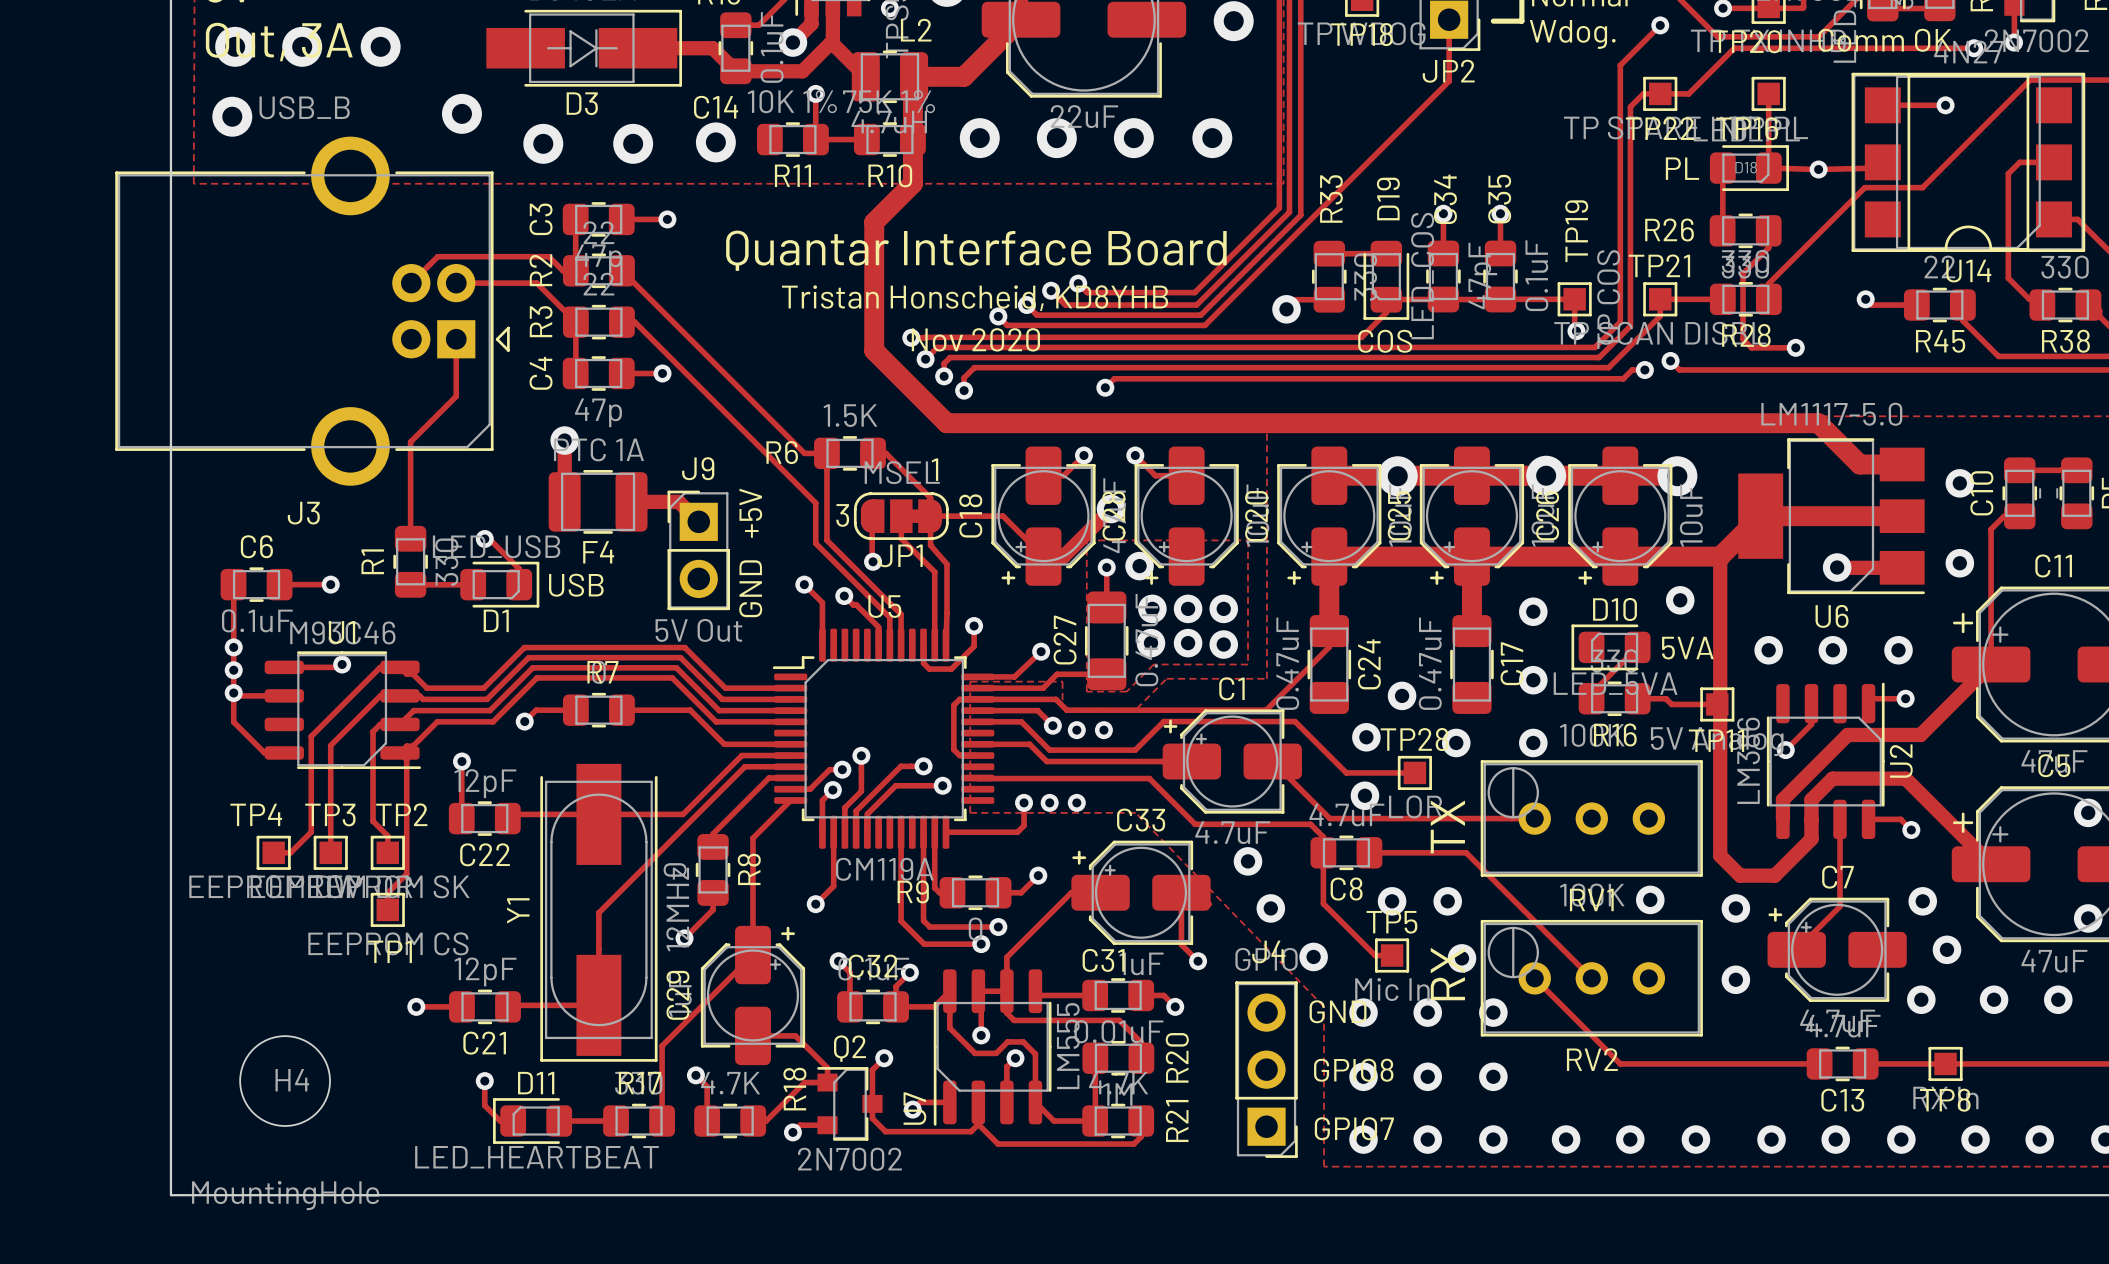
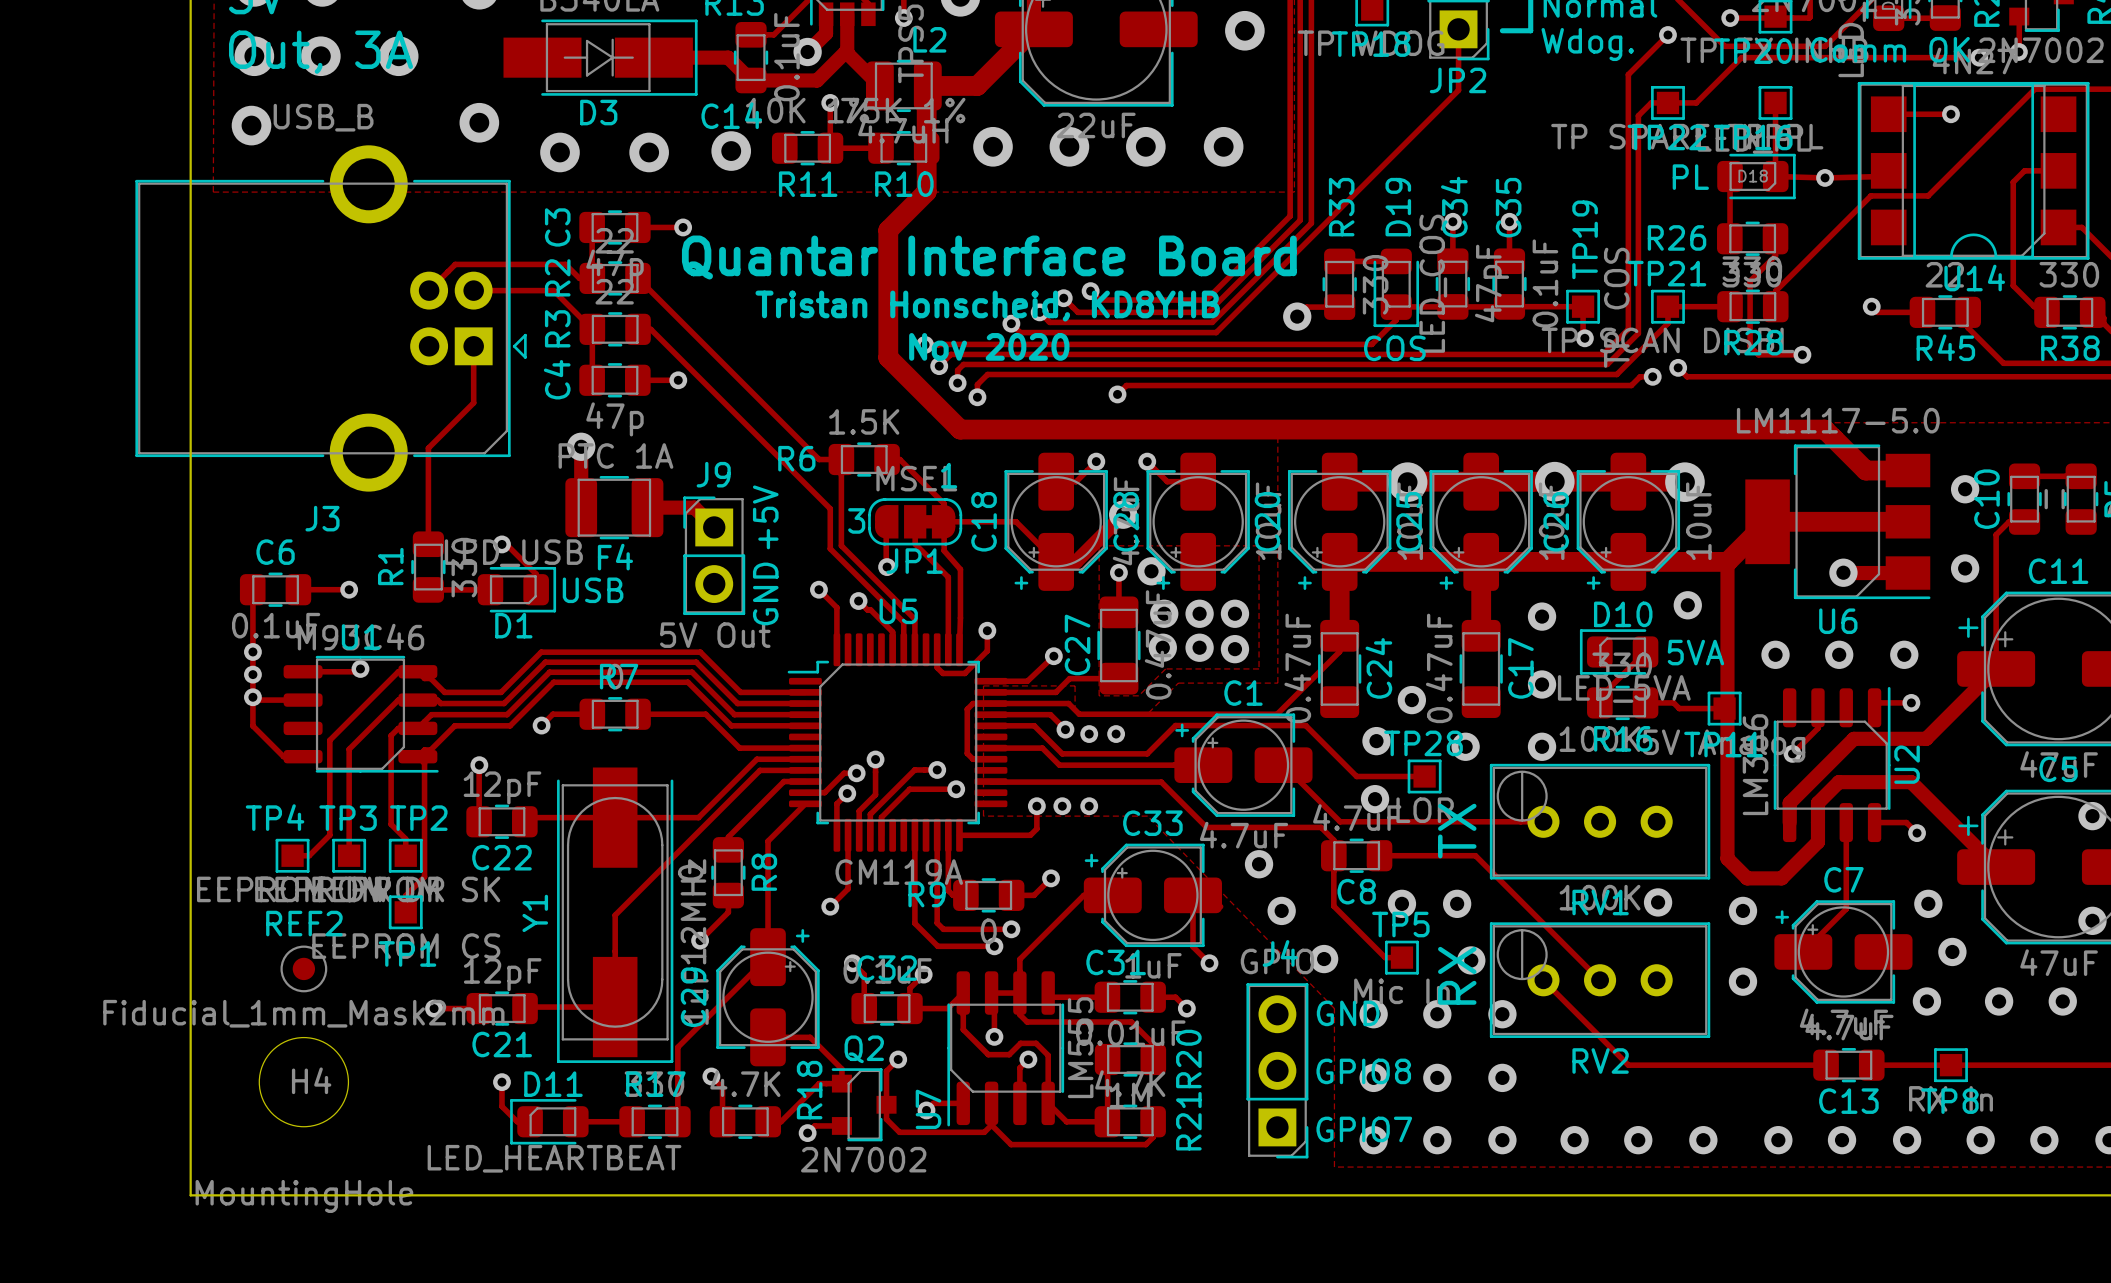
REF2: none -> Fiducial_1mm_Mask2mm (303, 968)

